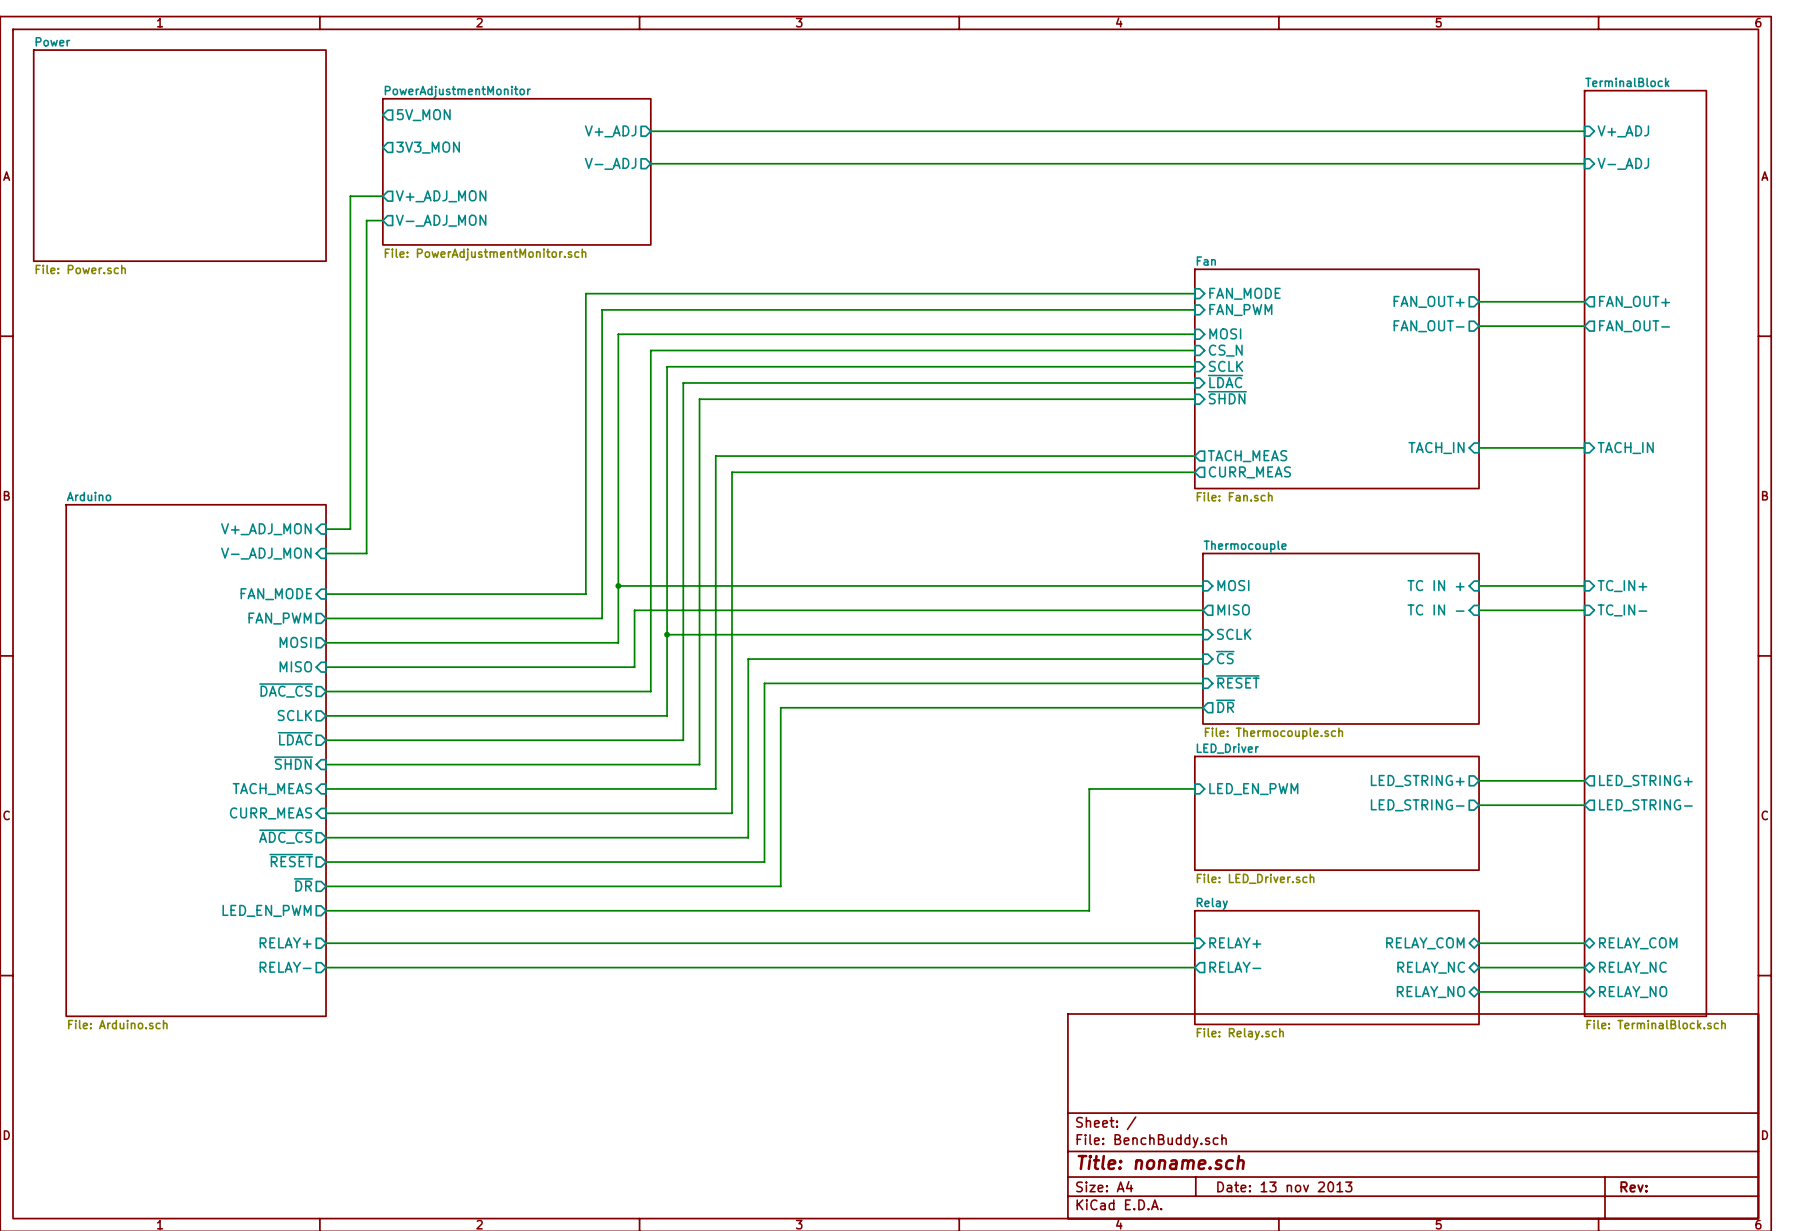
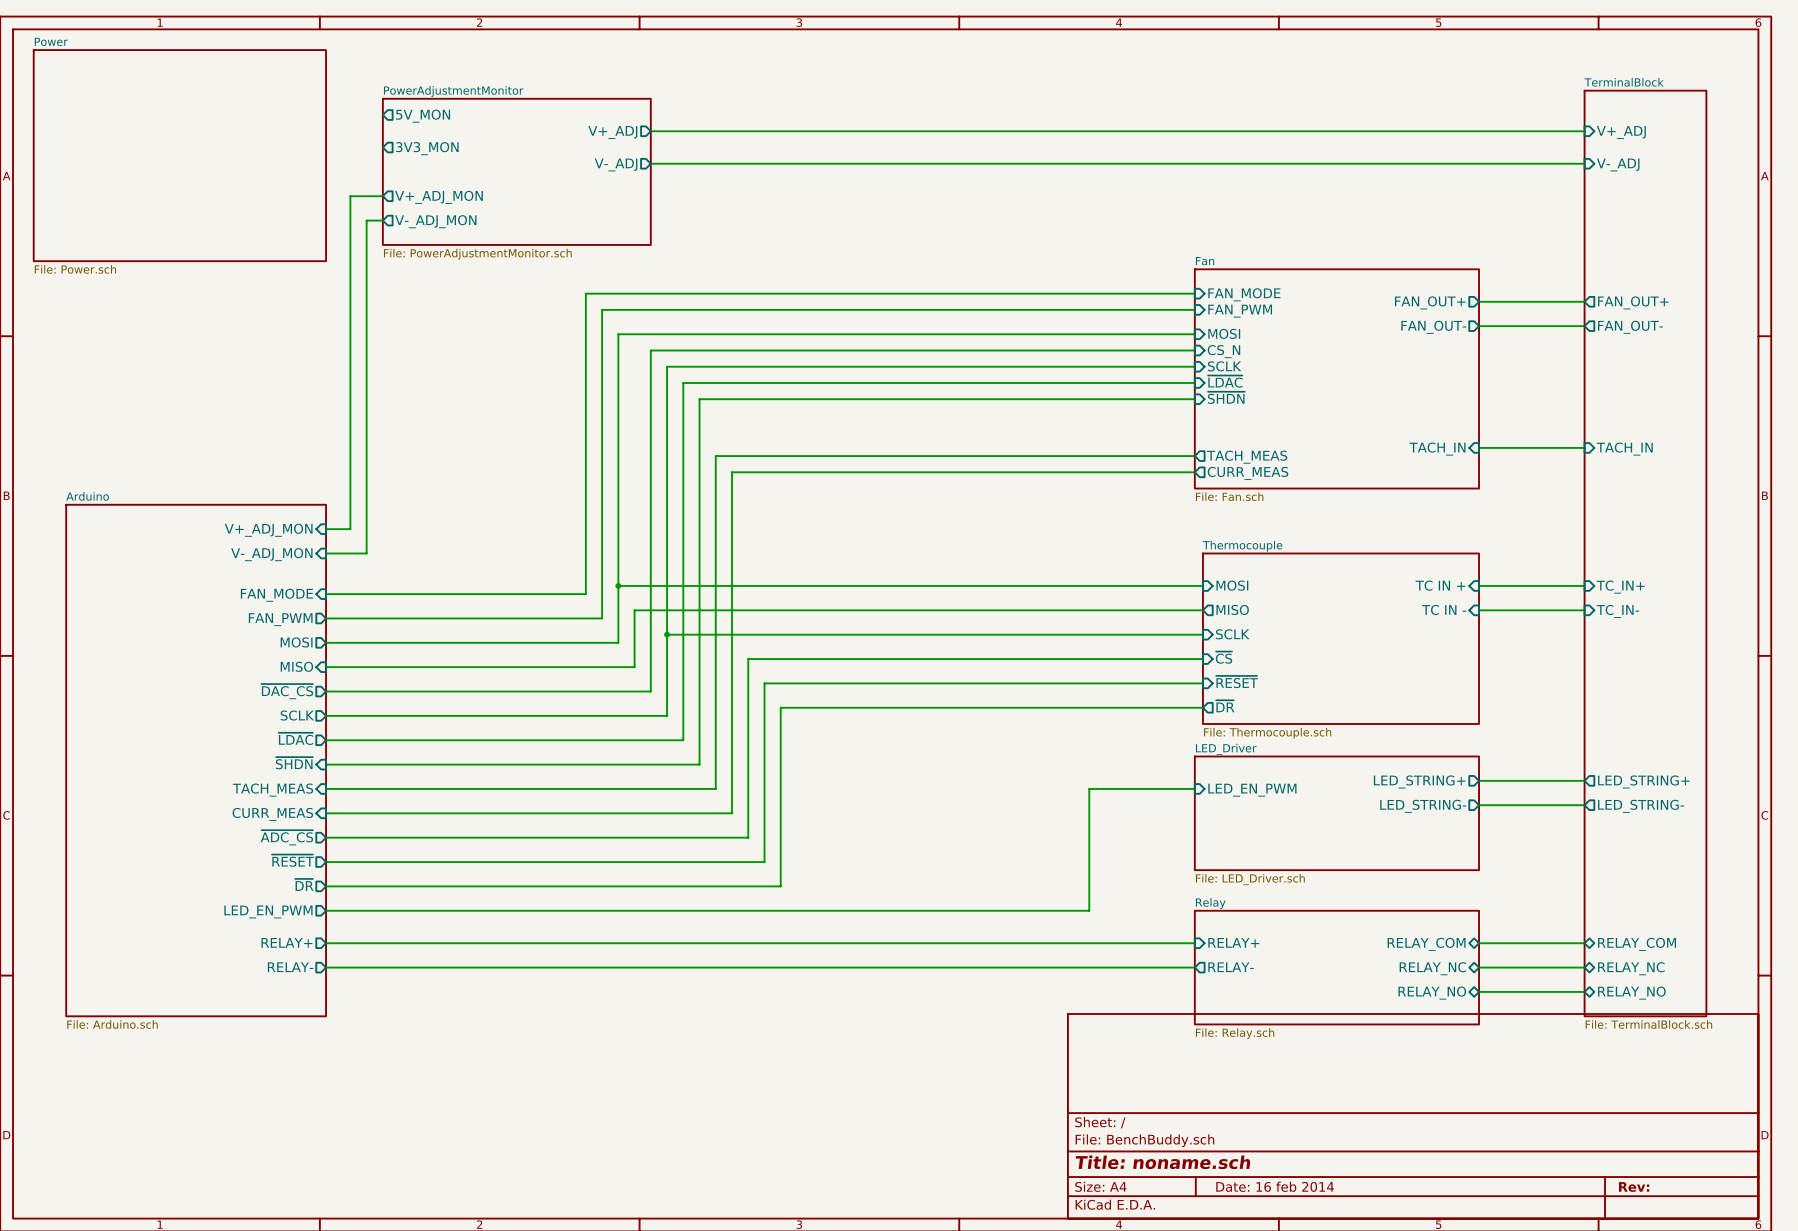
title block: Date: 13 nov 2013 (1284, 1186) -> Date: 16 feb 2014 (1275, 1186)

